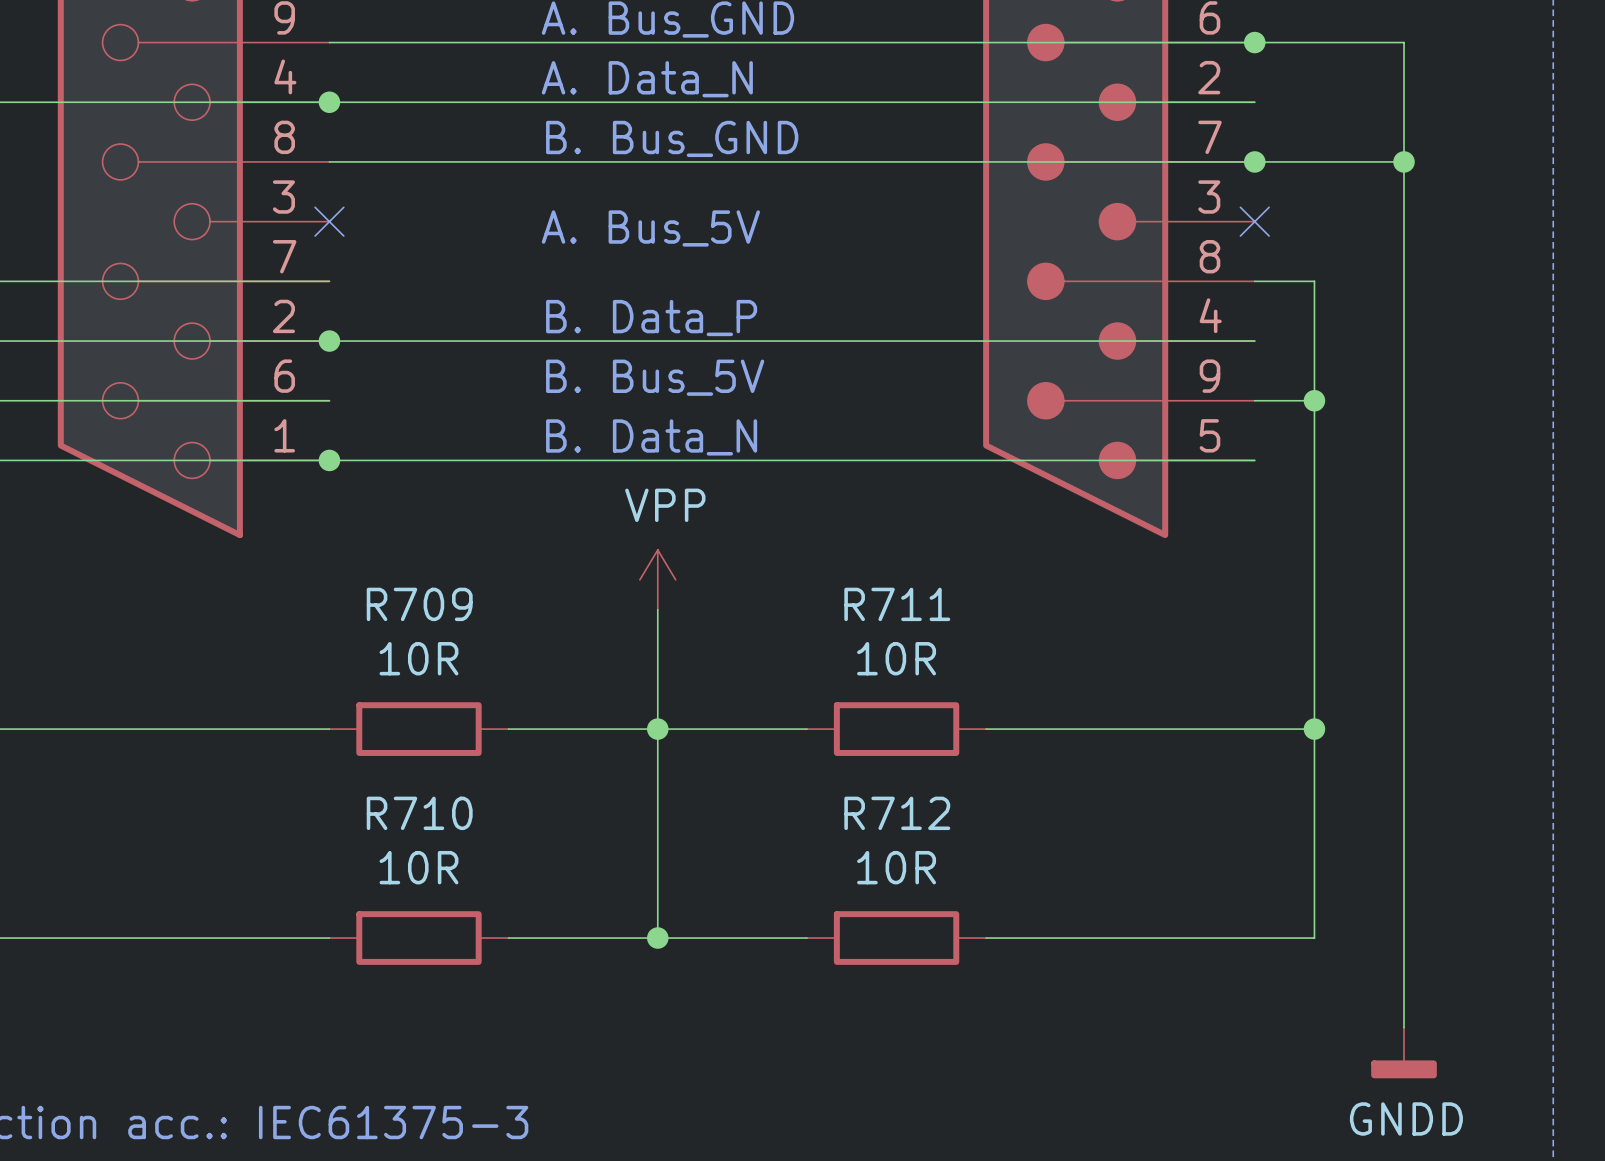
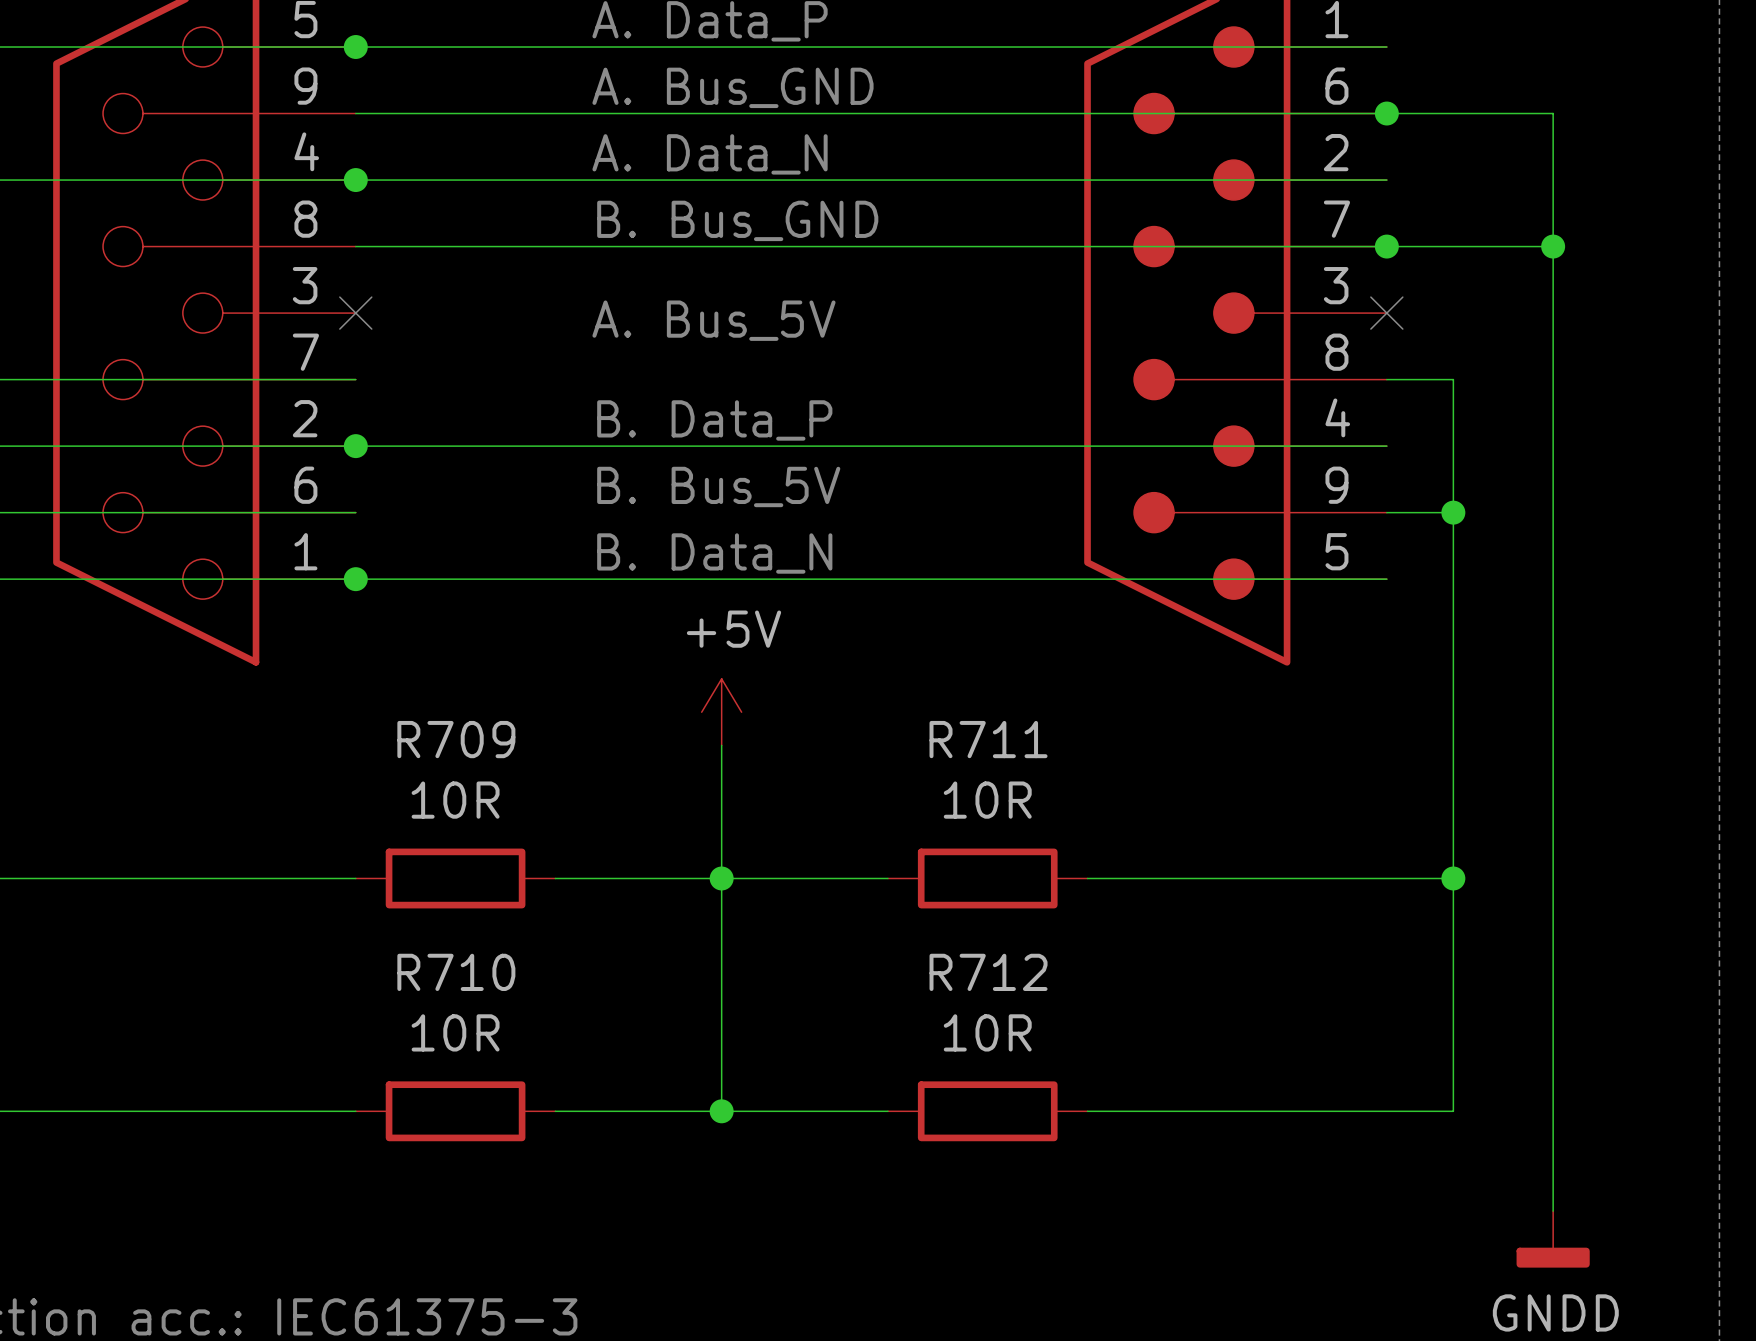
power symbol: VPP (657, 579) -> +5V (721, 712)

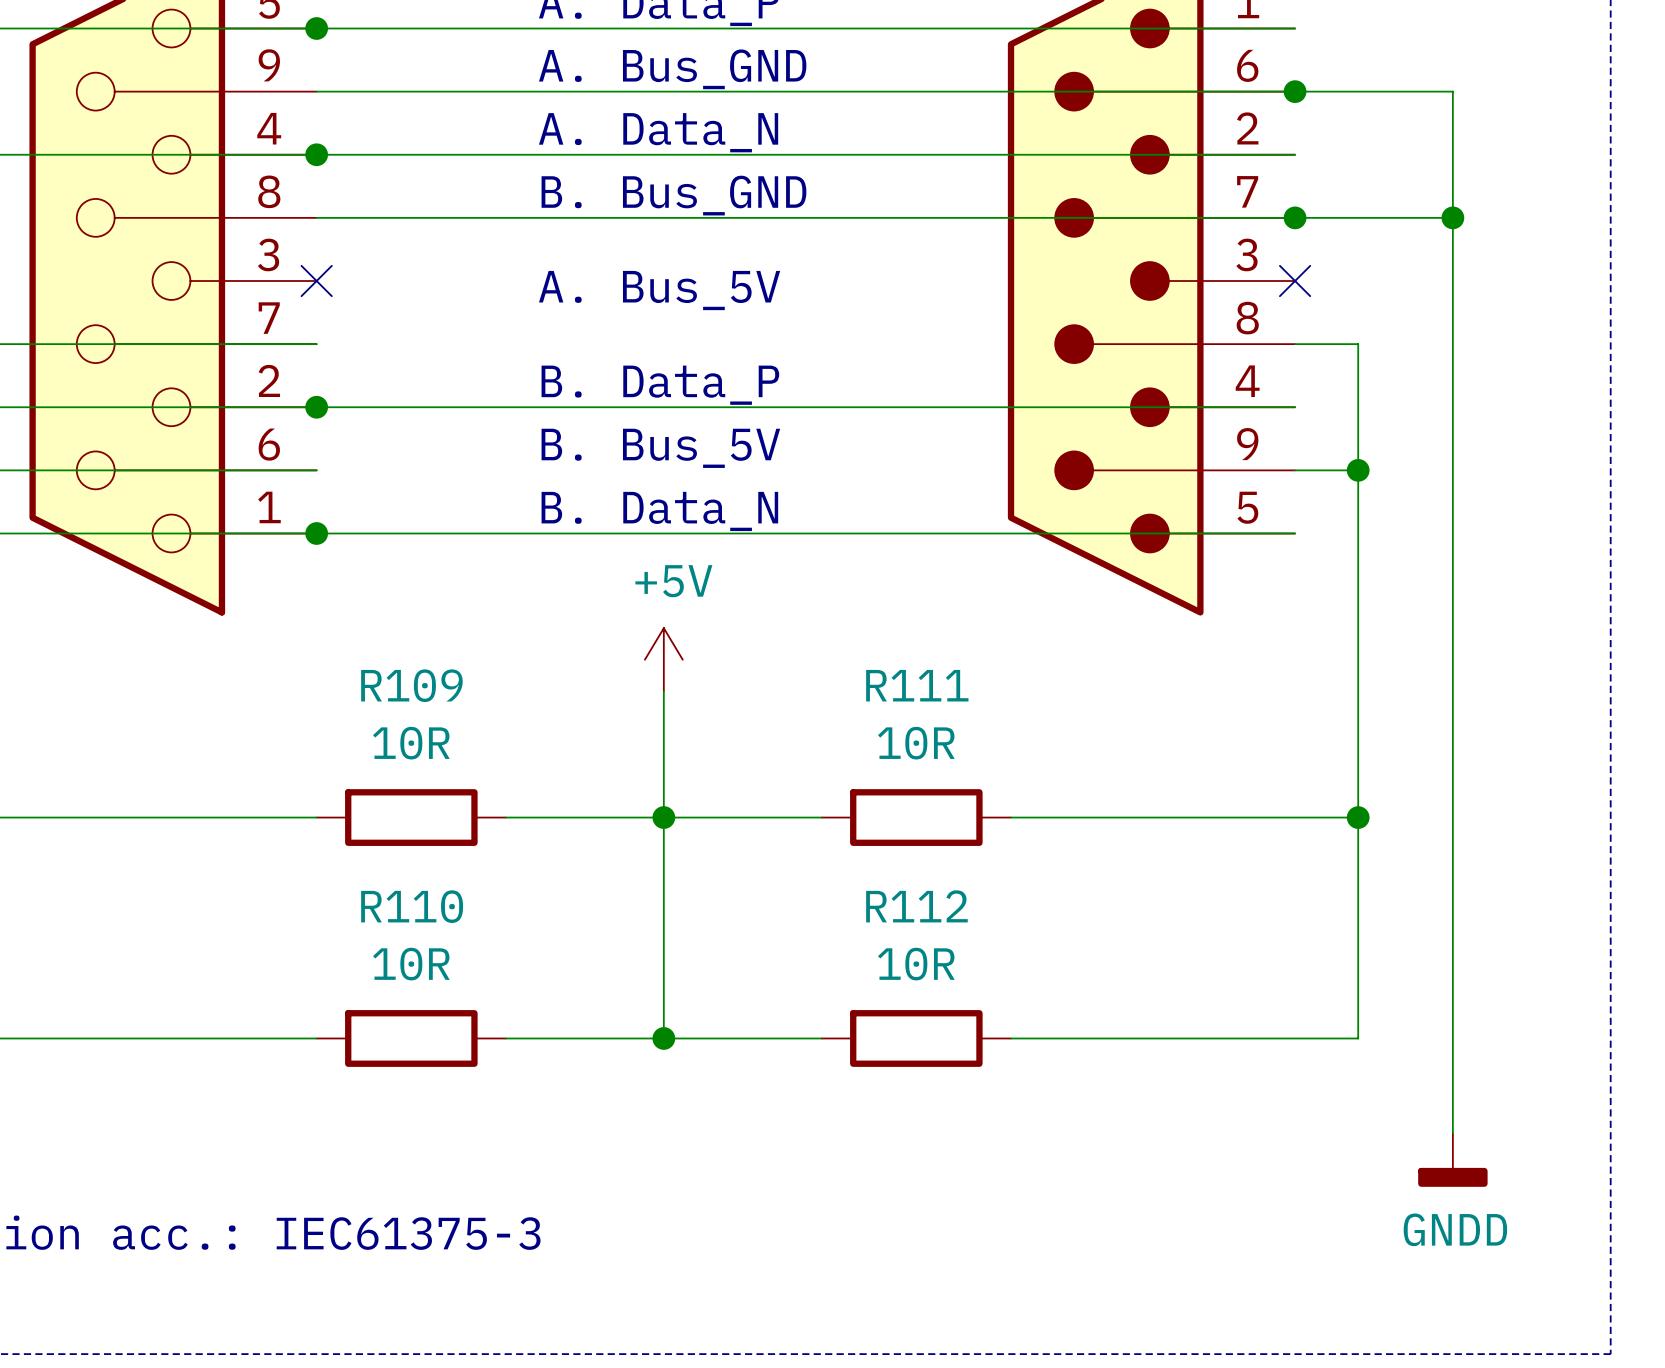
R709 name: R709 (456, 739) -> R109 (411, 685)
R711 name: R711 (988, 739) -> R111 (917, 685)
R710 name: R710 (456, 972) -> R110 (412, 906)
R712 name: R712 (988, 972) -> R112 (916, 906)

